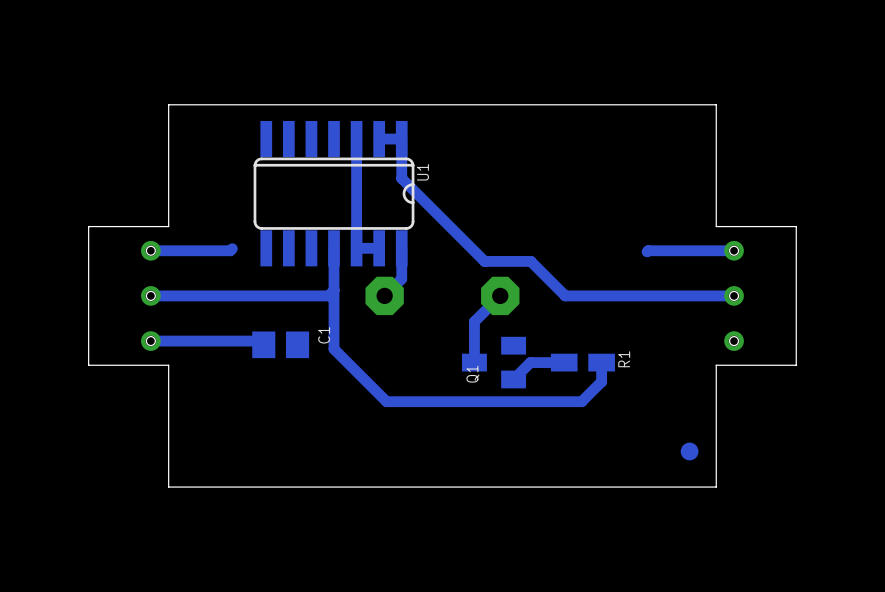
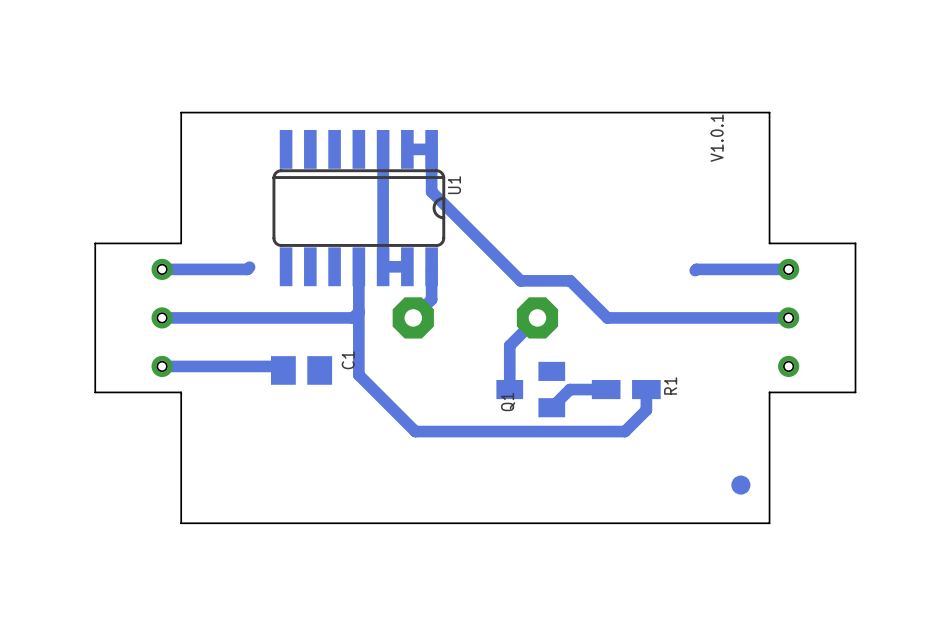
text: none -> V1.0.1 (717, 138)

